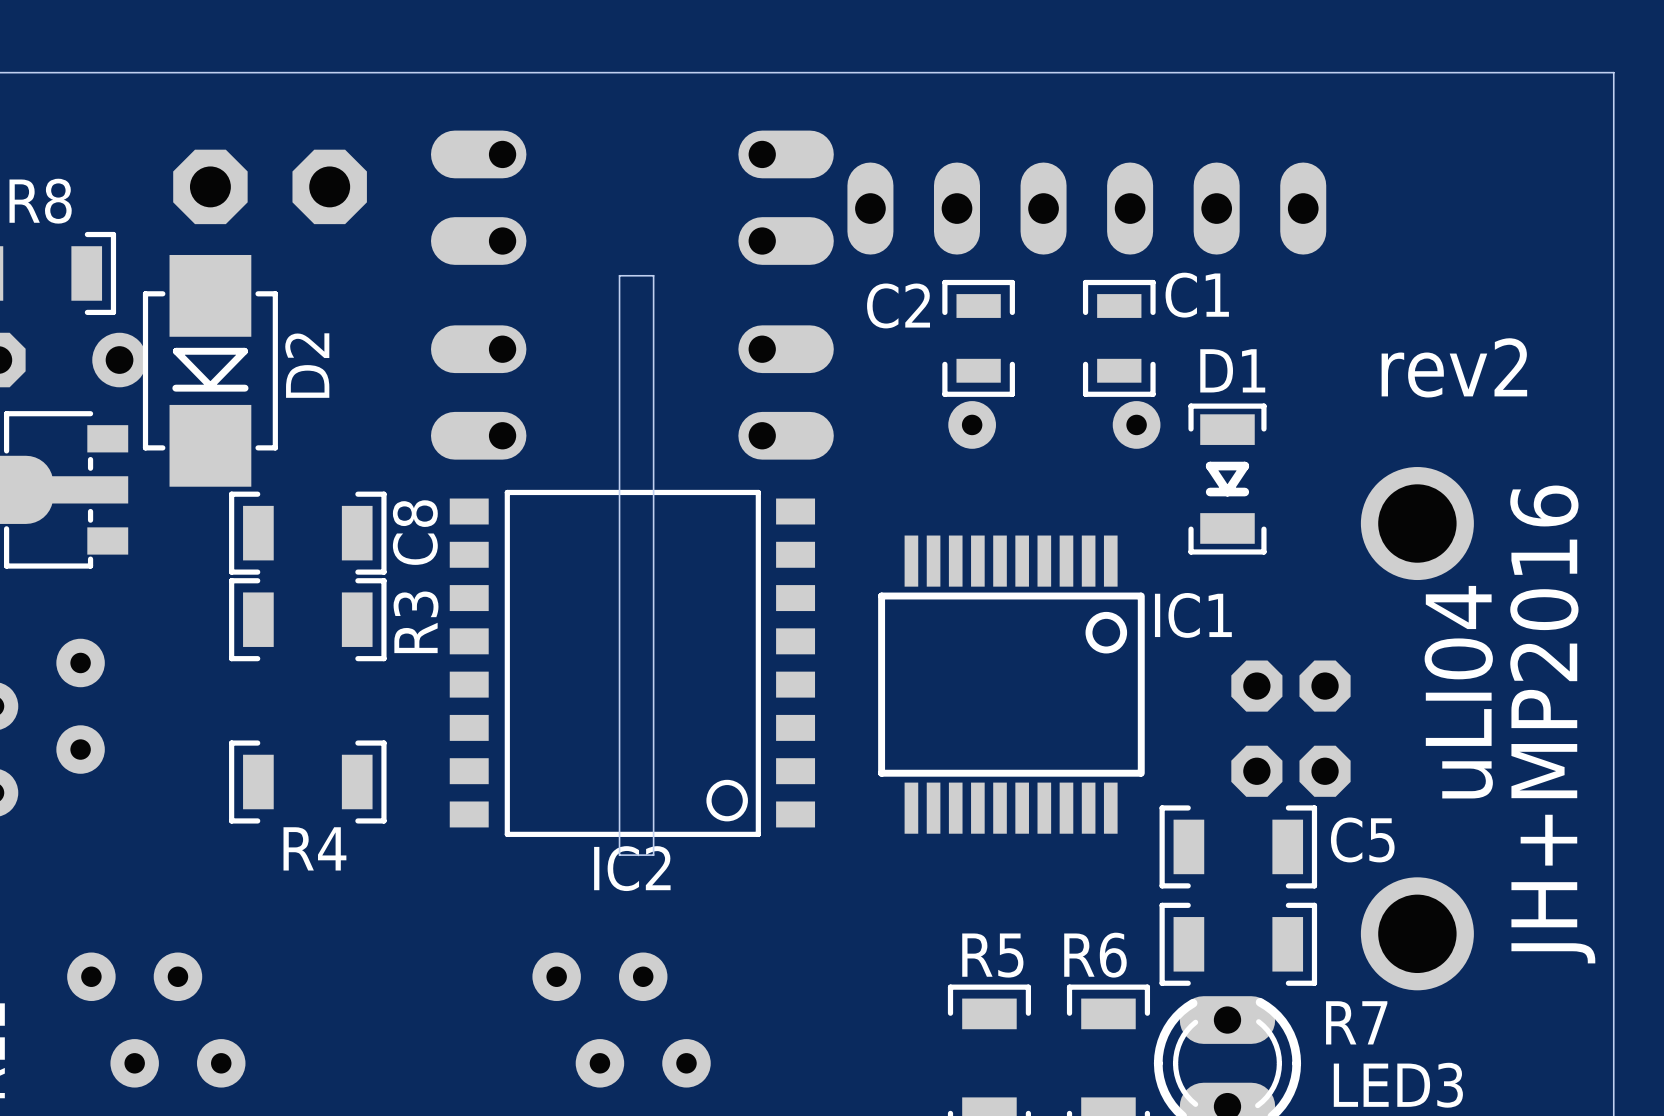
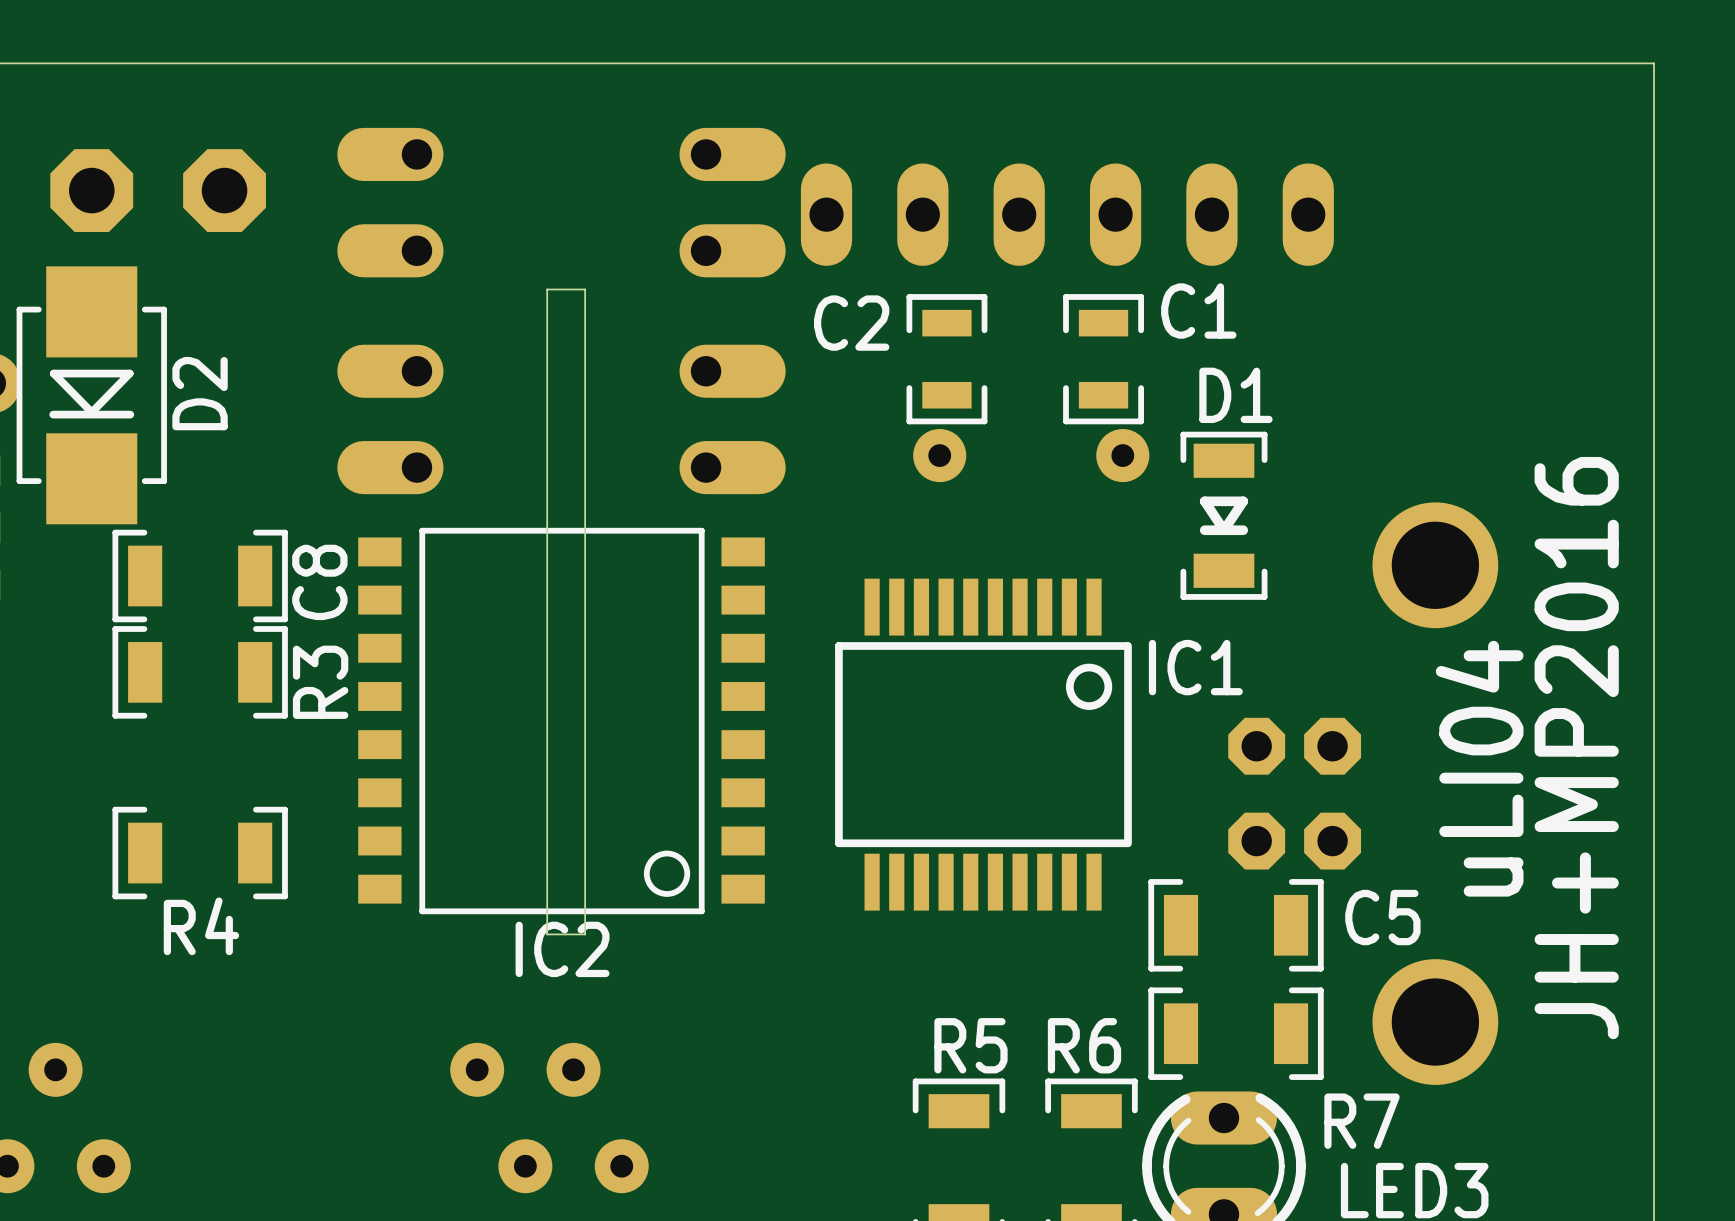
text: rev2 (1454, 367) -> none

